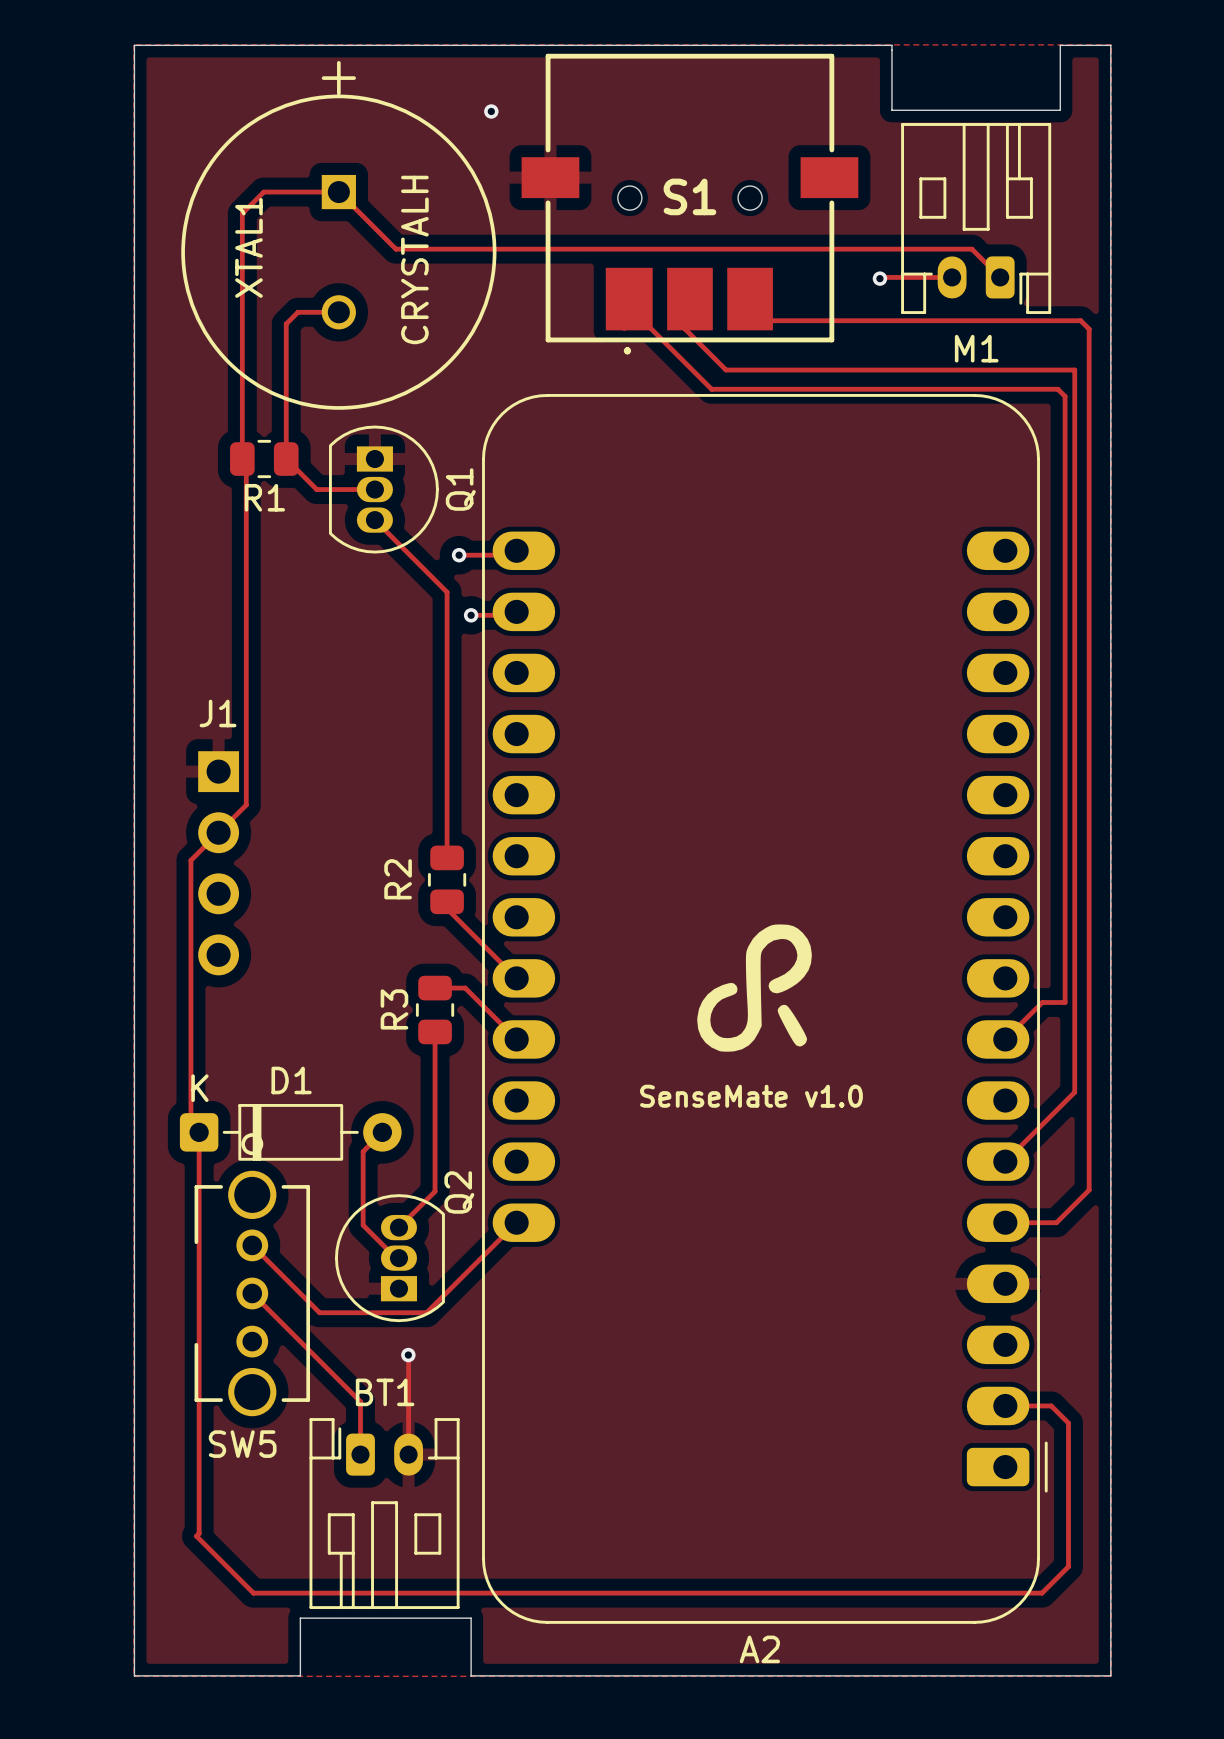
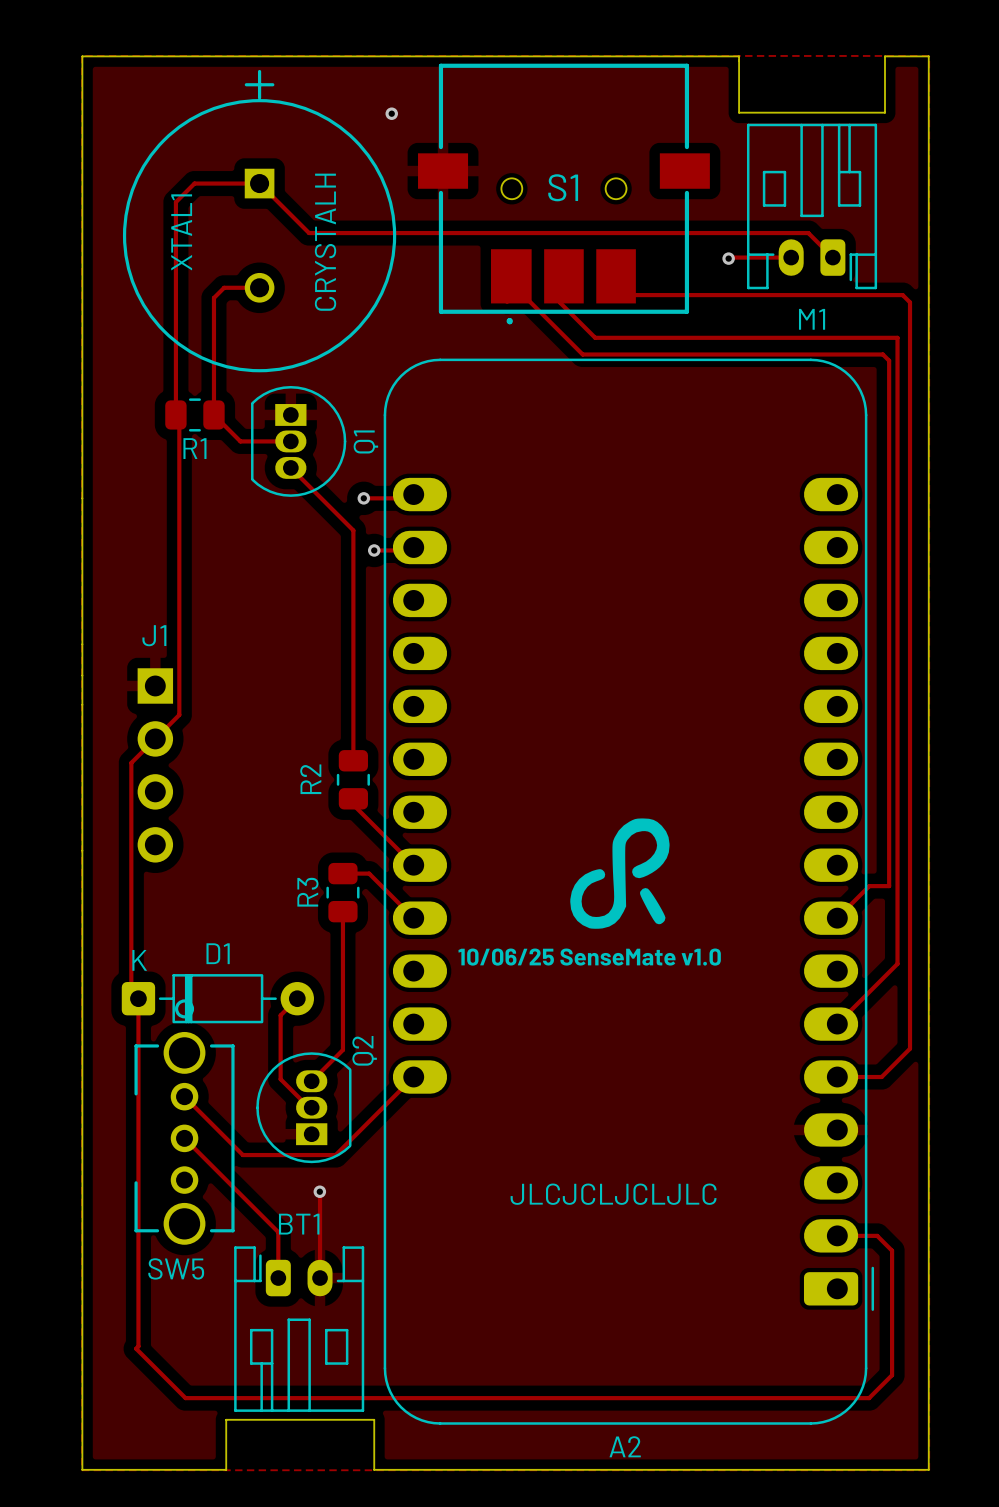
text: SenseMate v1.0 (751, 1096) -> 10/06/25 SenseMate v1.0 (589, 957)
text: none -> JLCJCLJCLJLC (613, 1194)

